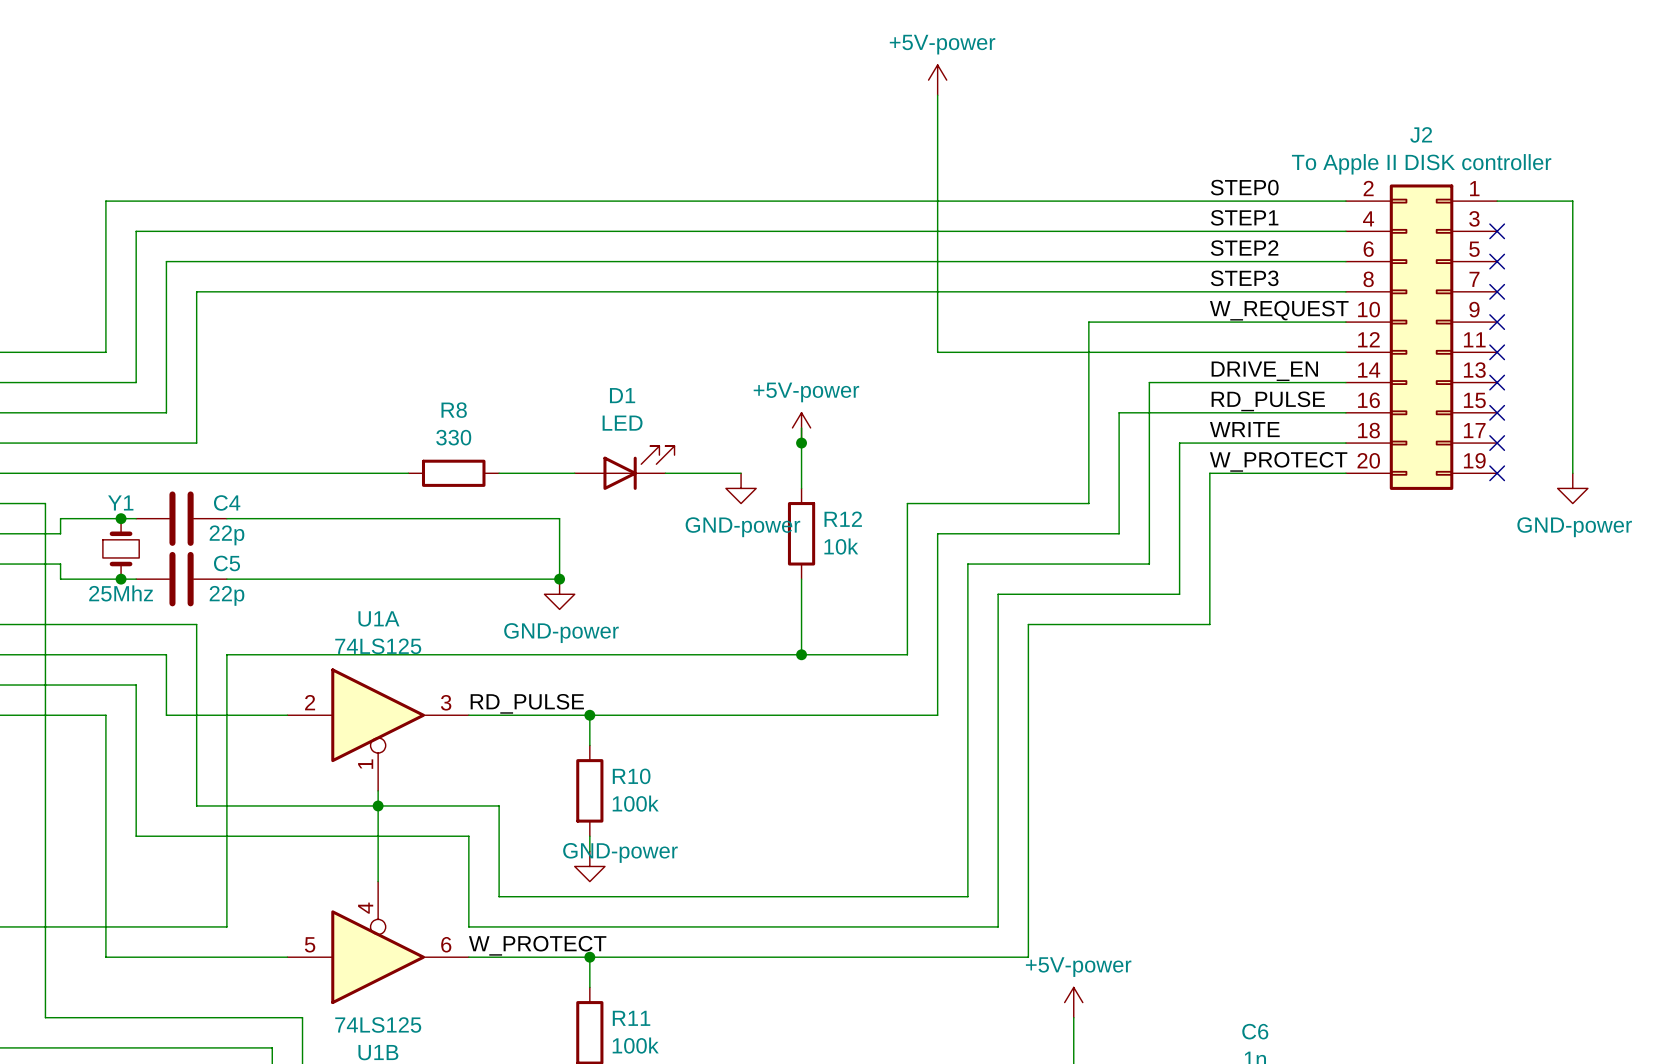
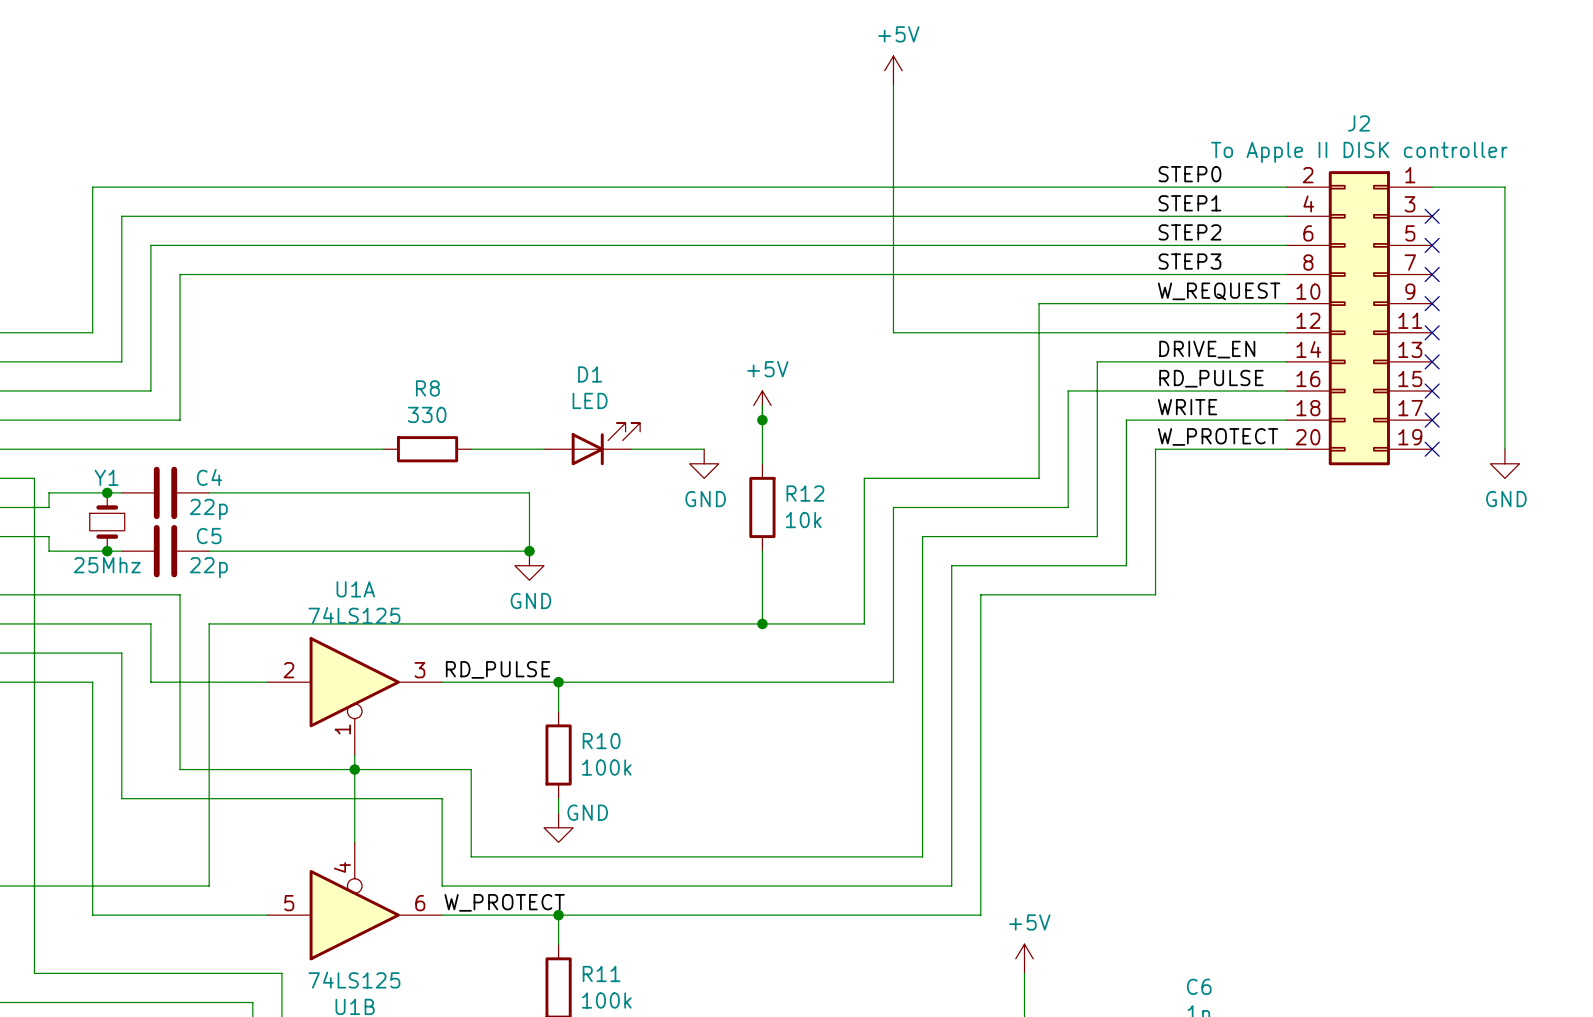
power symbol: +5V-power (937, 80) -> +5V (893, 70)
power symbol: +5V-power (801, 427) -> +5V (762, 405)
power symbol: GND-power (741, 488) -> GND (704, 463)
power symbol: GND-power (1572, 488) -> GND (1504, 463)
power symbol: GND-power (559, 594) -> GND (529, 565)
power symbol: GND-power (589, 866) -> GND (558, 827)
power symbol: +5V-power (1073, 1002) -> +5V (1024, 958)

